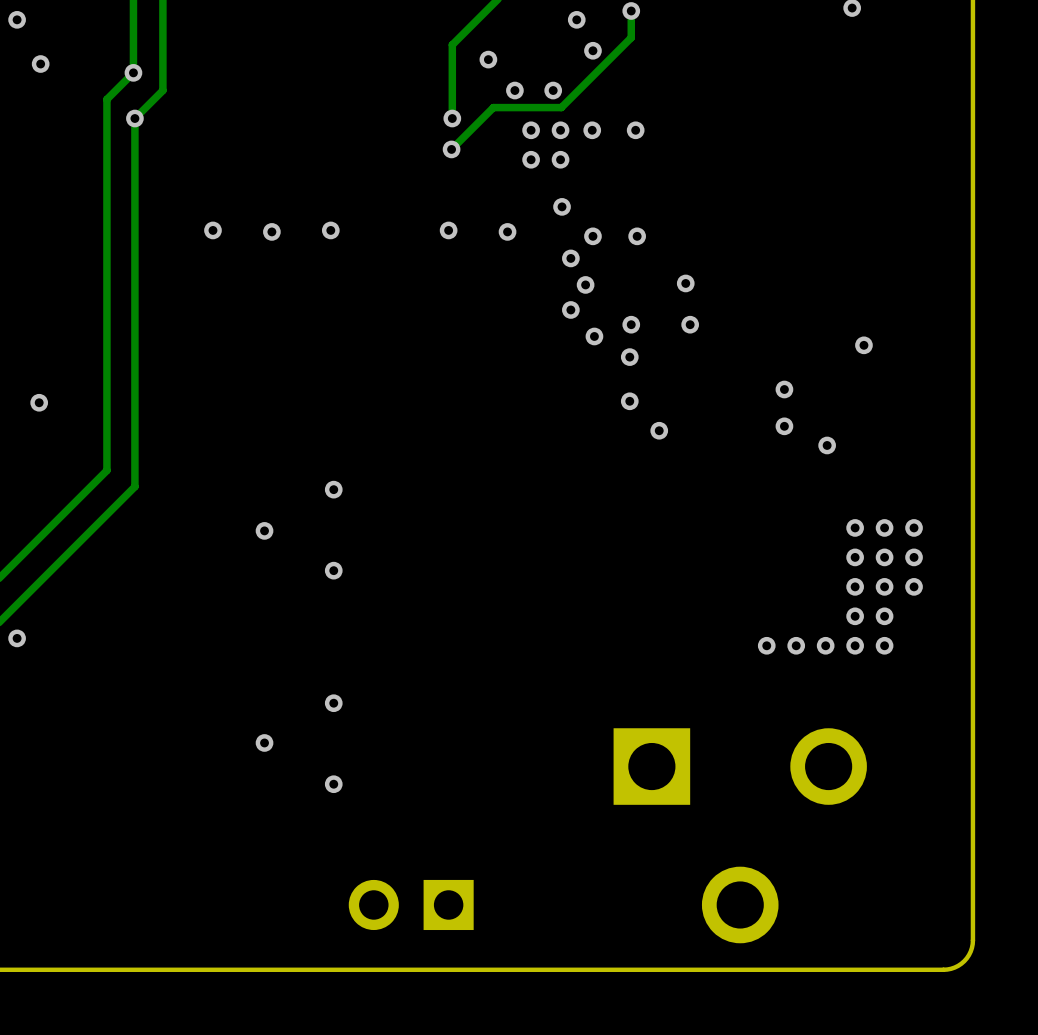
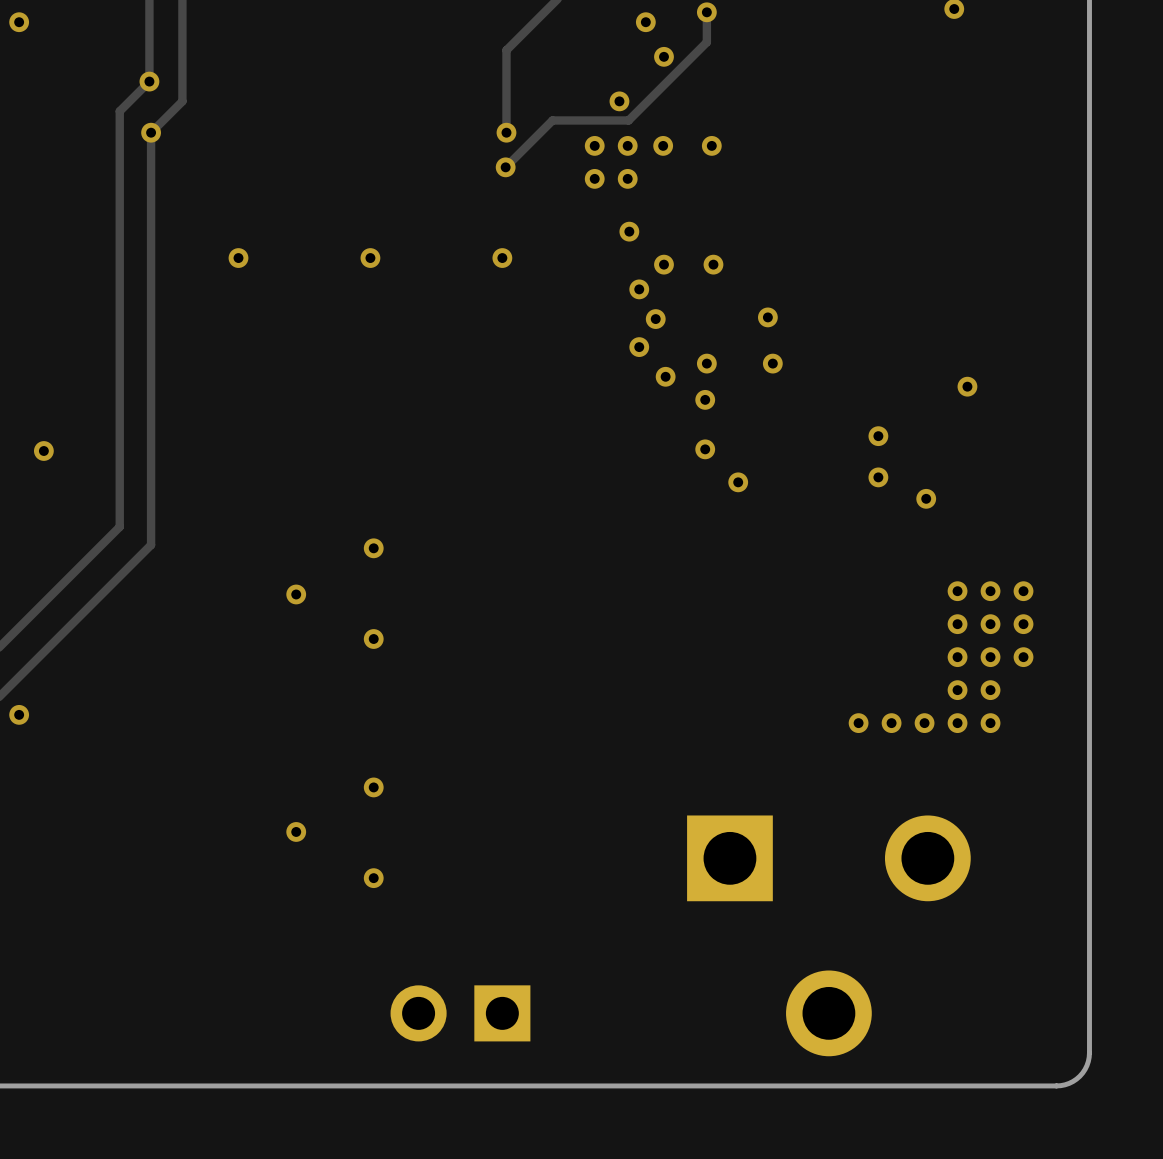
via: (488, 59) -> none
via: (40, 64) -> none
via: (514, 90) -> none
via: (271, 231) -> none
via: (507, 231) -> none

